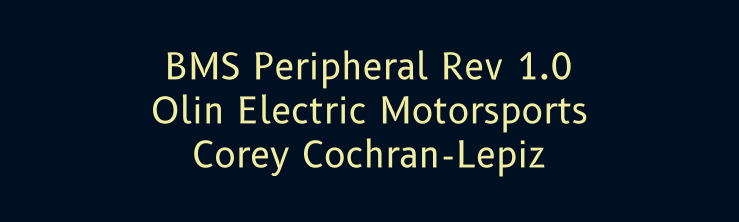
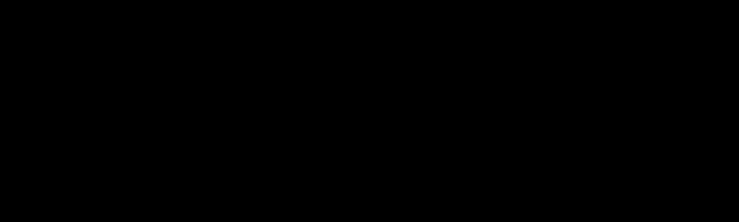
text: BMS Peripheral Rev 1.0 (369, 69) -> none
text: Olin Electric Motorsports (369, 113) -> none
text: Corey Cochran-Lepiz (369, 157) -> none

